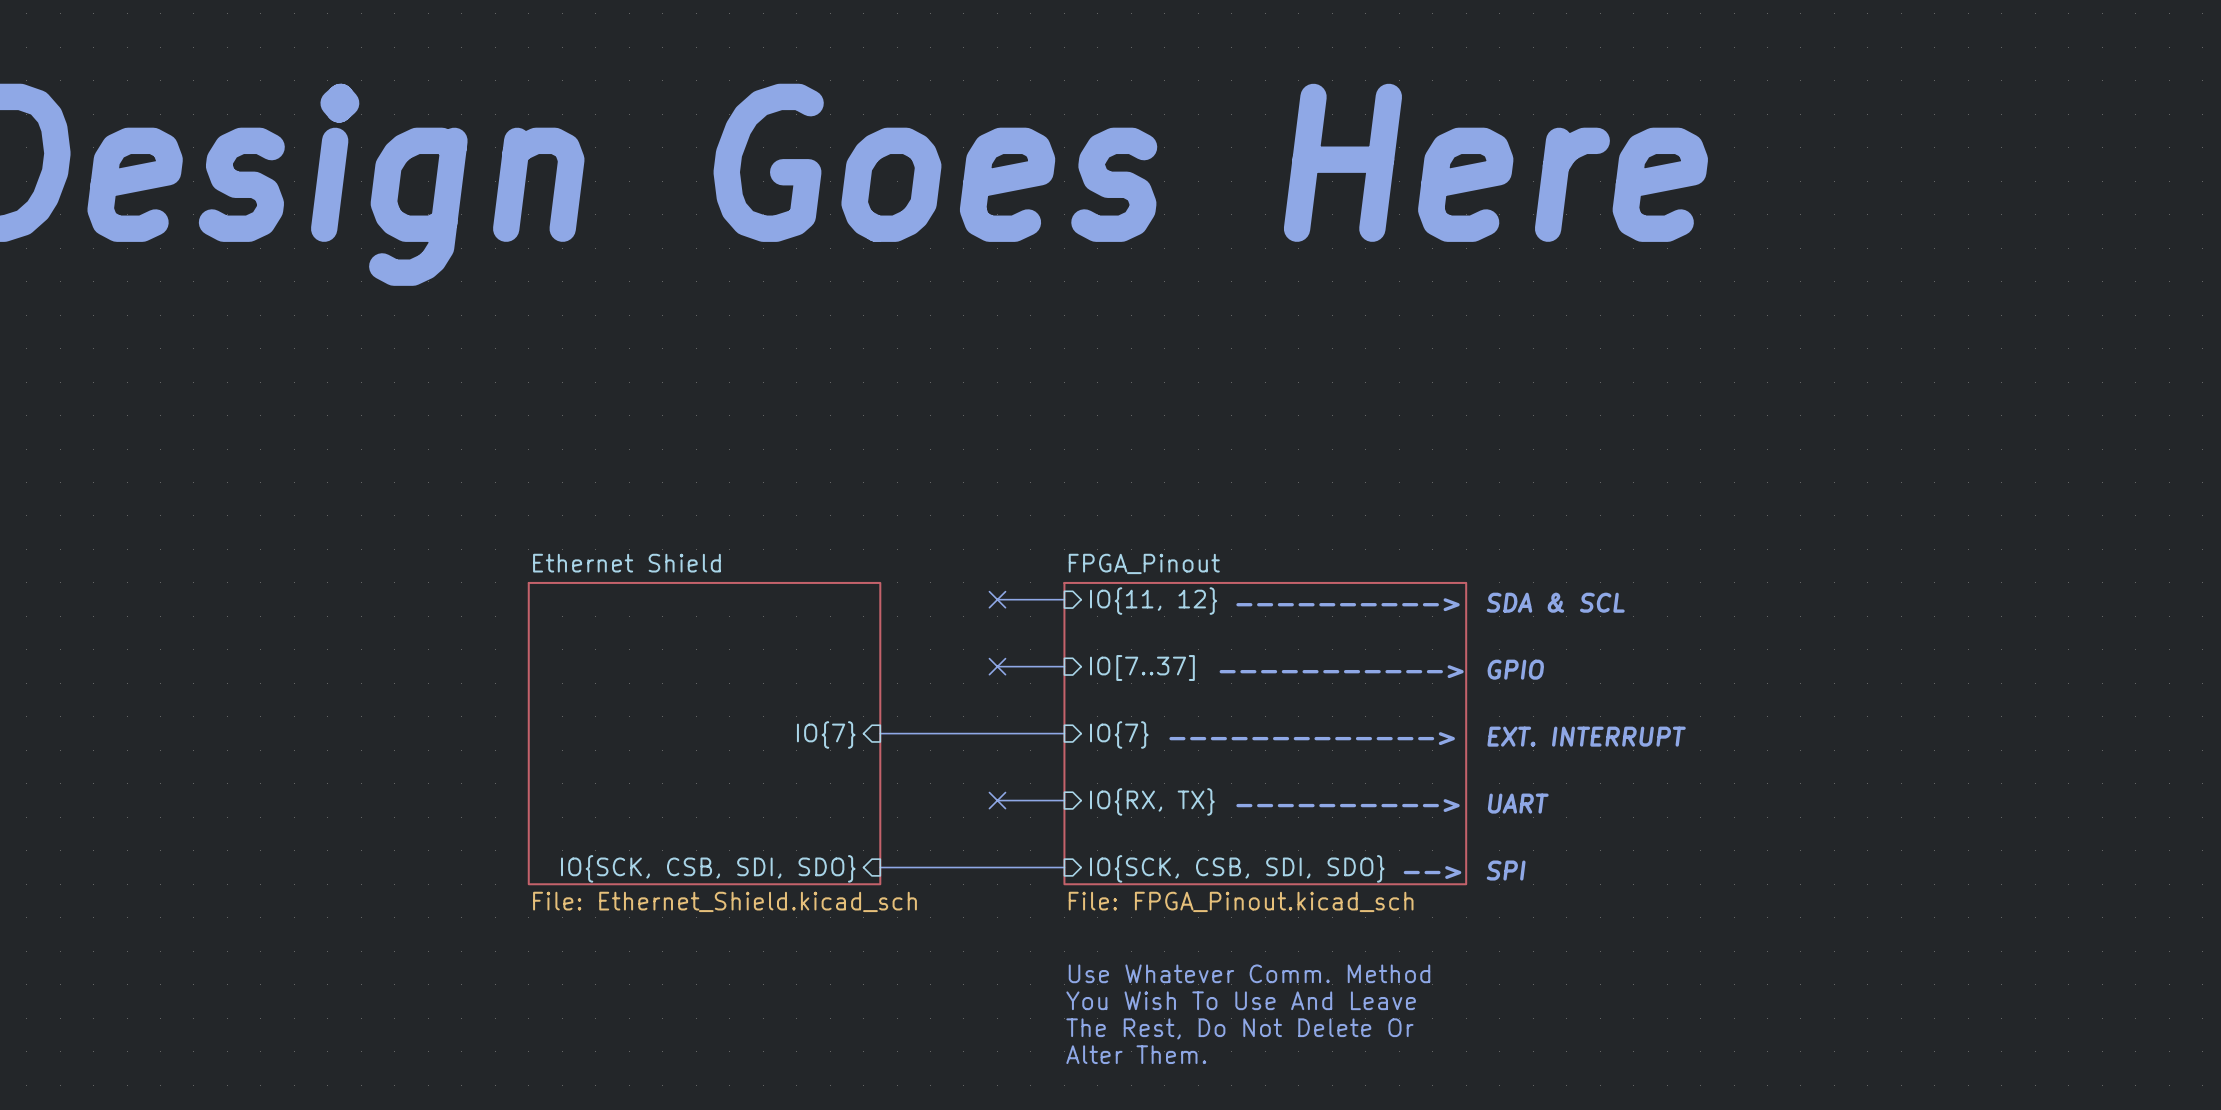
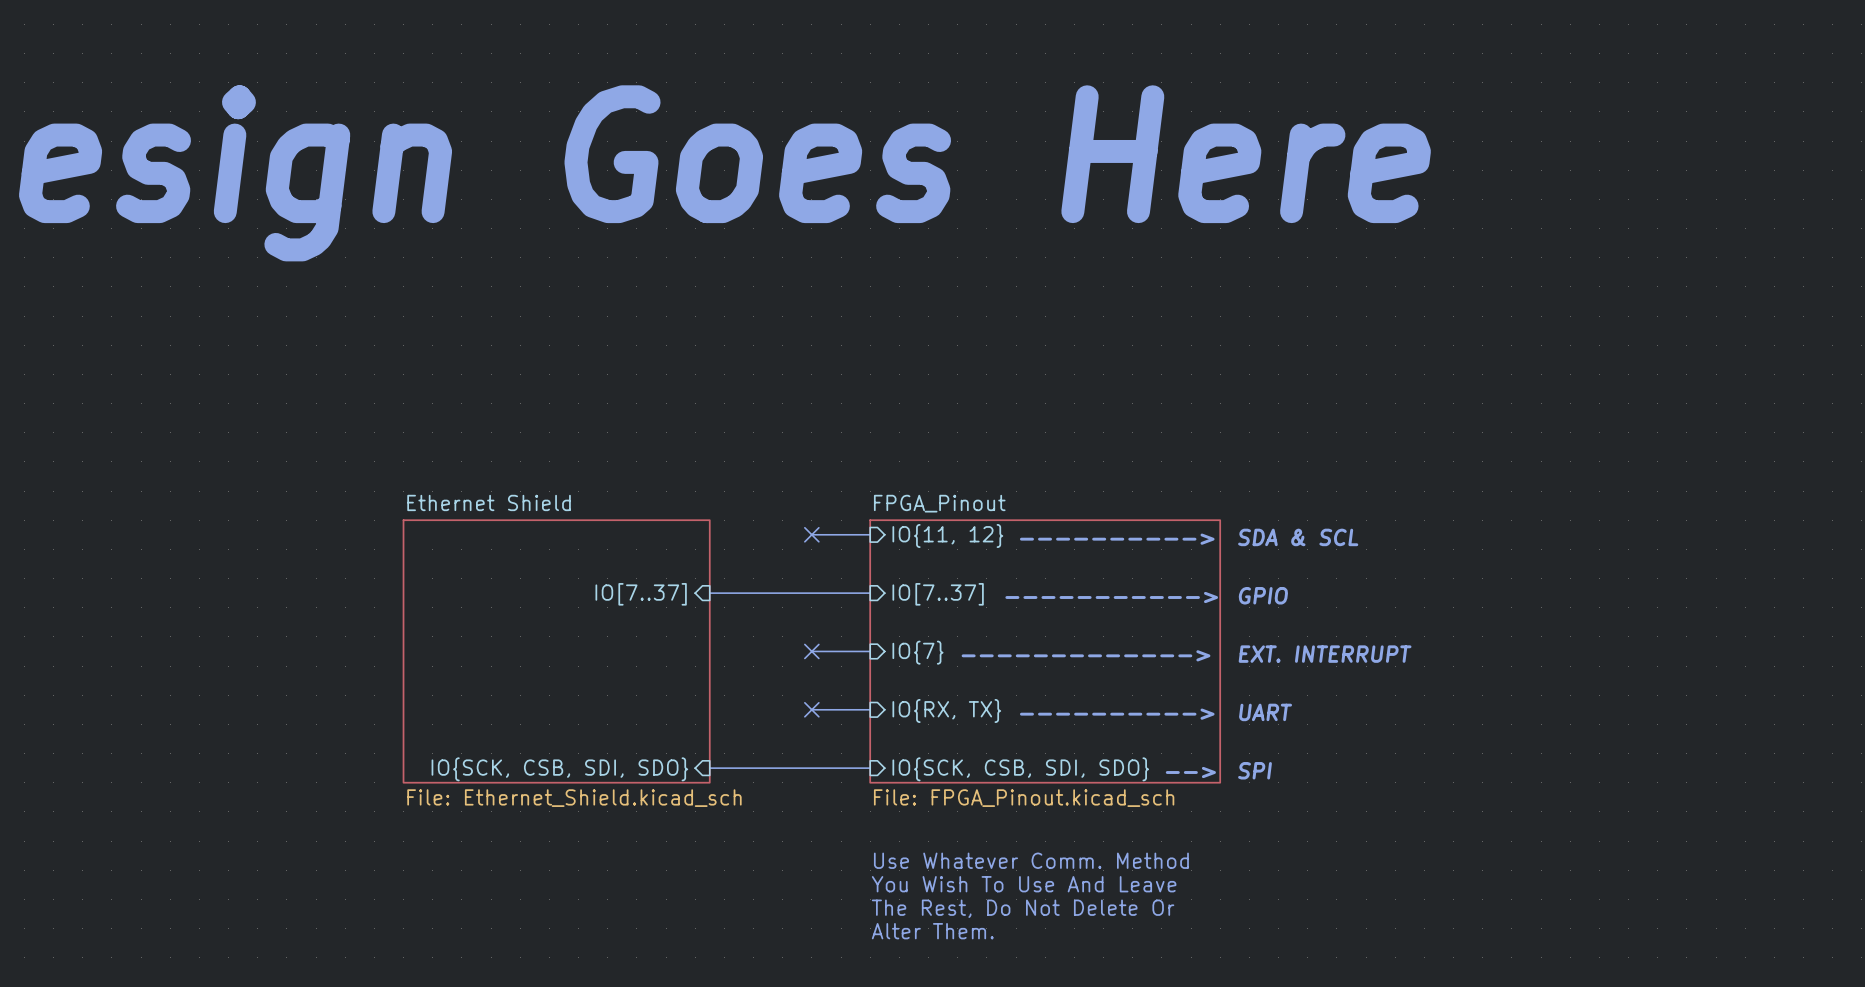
no-connect mark position: (997, 666) -> (811, 651)
sheet pin: none -> IO[7..37] (641, 594)
bus: (880, 733) (997, 733) -> (709, 593) (811, 593)
sheet pin: IO{7} (826, 734) -> none

